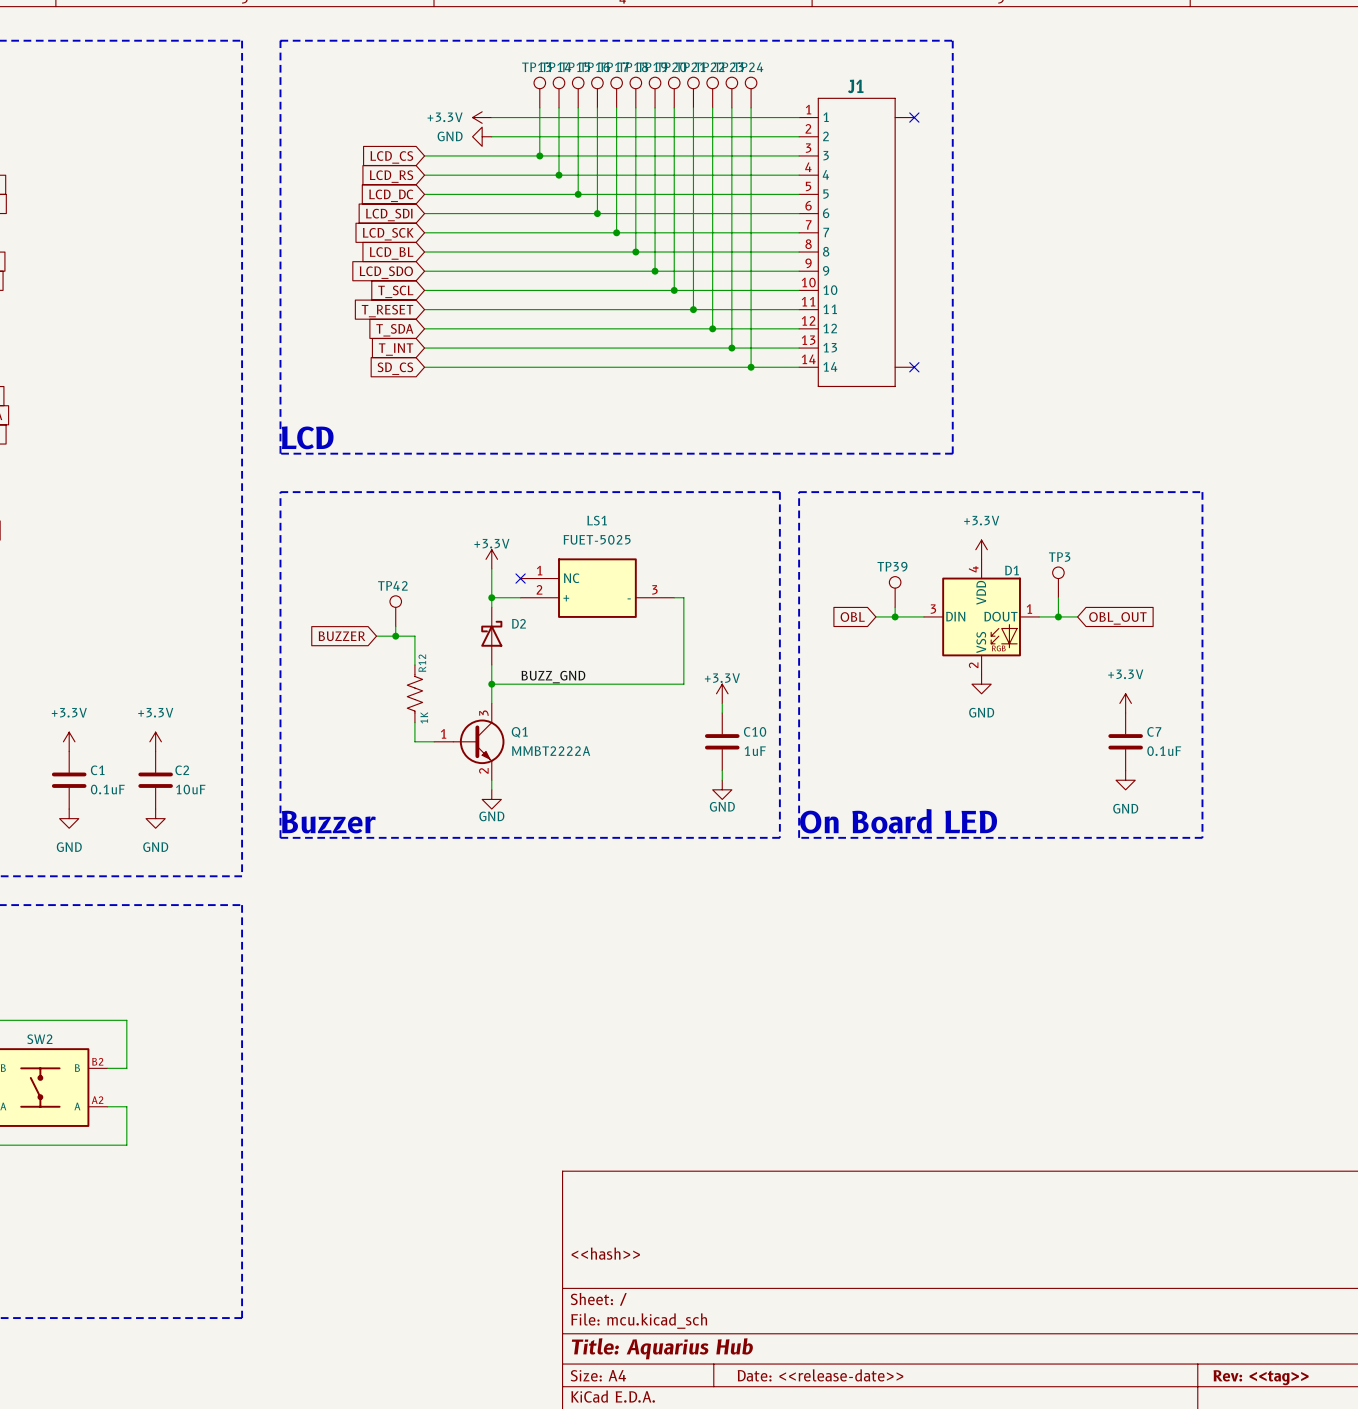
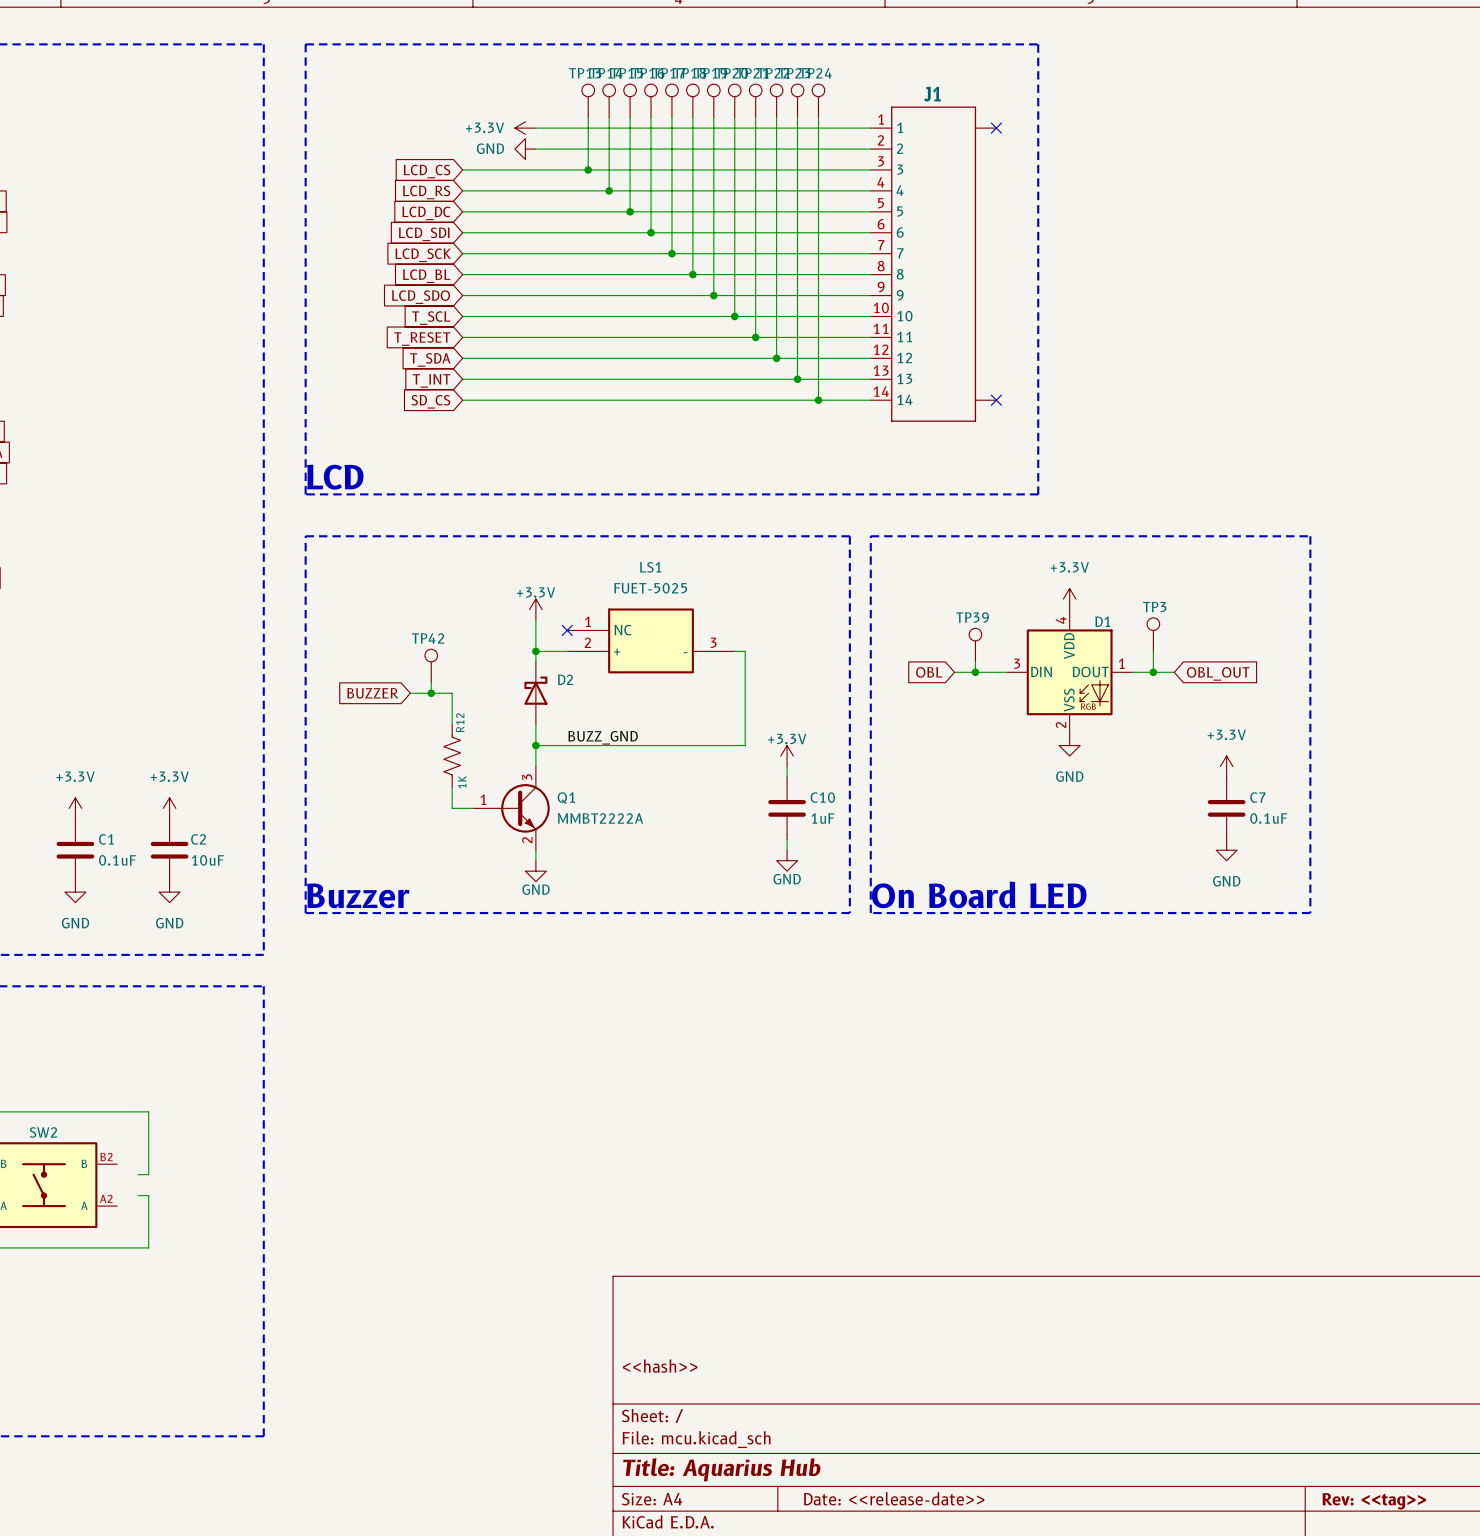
wire: (126, 1020) (126, 1068) (107, 1068) -> (138, 1111) (148, 1111) (148, 1174) (138, 1174)
wire: (107, 1106) (126, 1106) (126, 1145) -> (138, 1195) (148, 1195) (148, 1247) (138, 1247)

